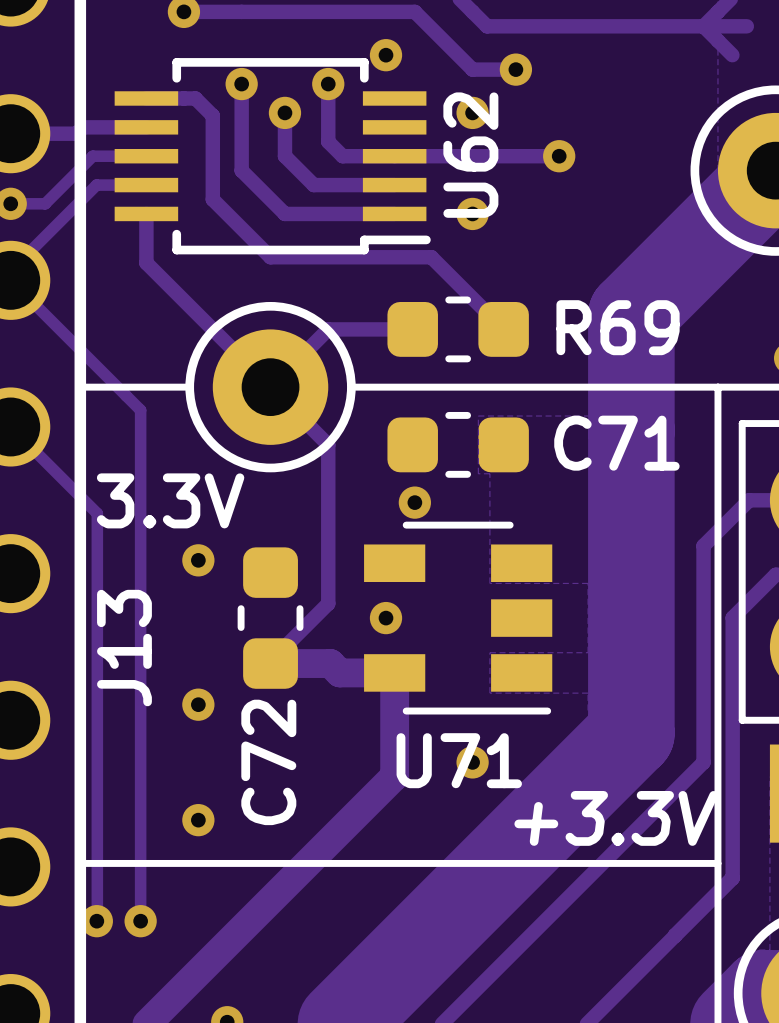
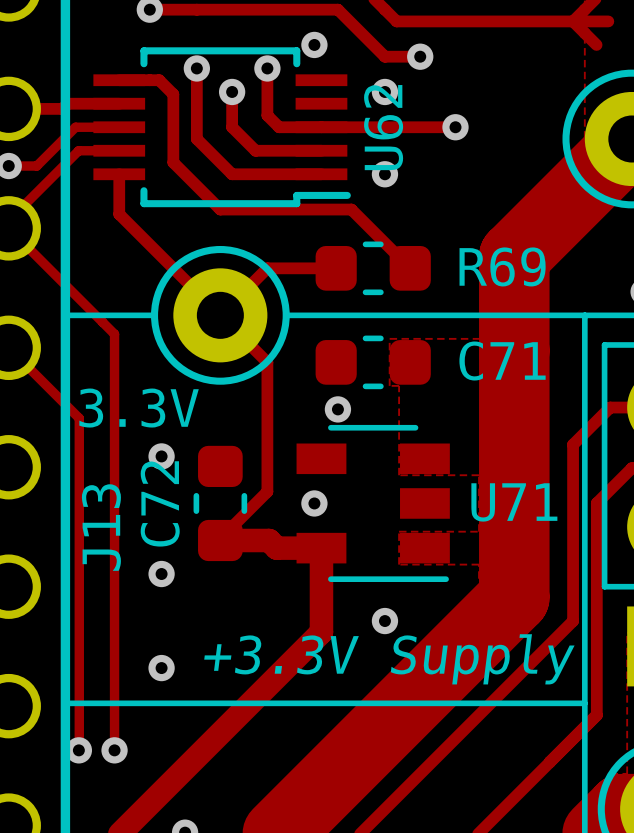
U71 name position: U71 (459, 760) -> U71 (514, 502)
C72 name position: C72 (268, 762) -> C72 (160, 503)
text: +3.3V (616, 818) -> +3.3V Supply (389, 659)

